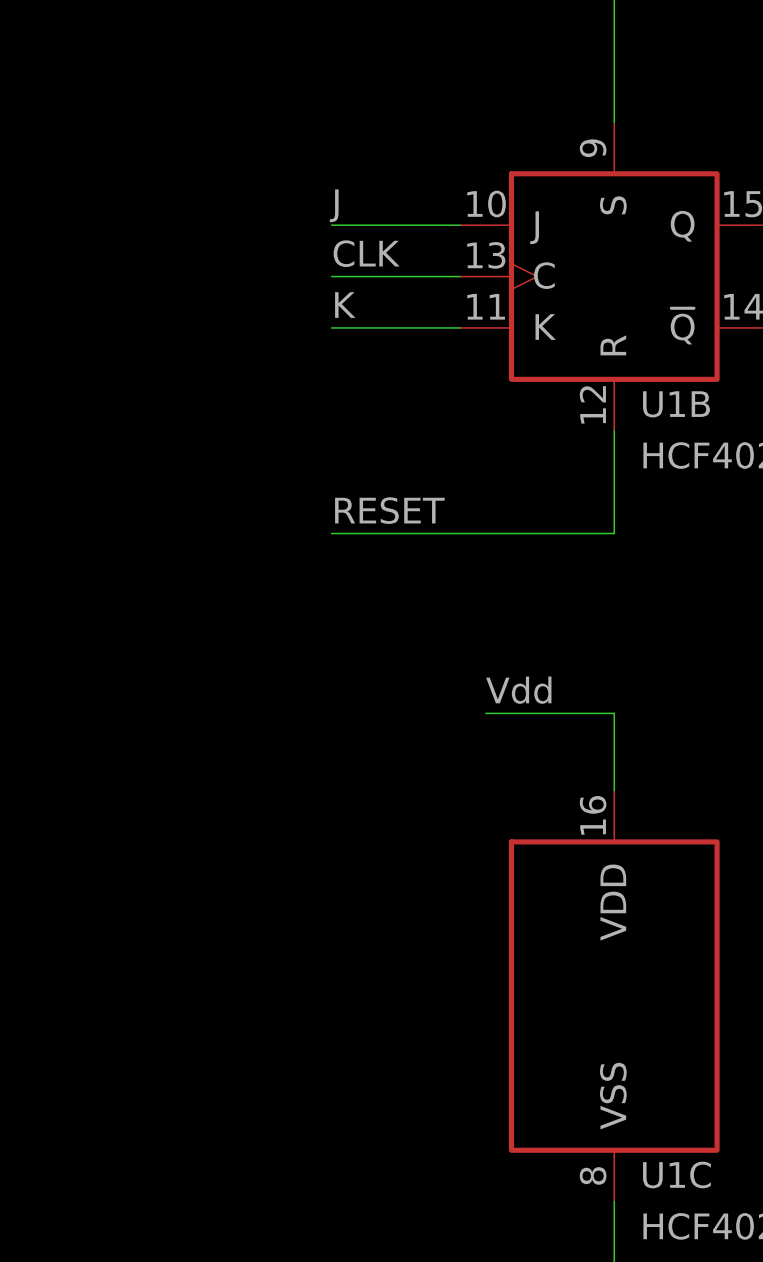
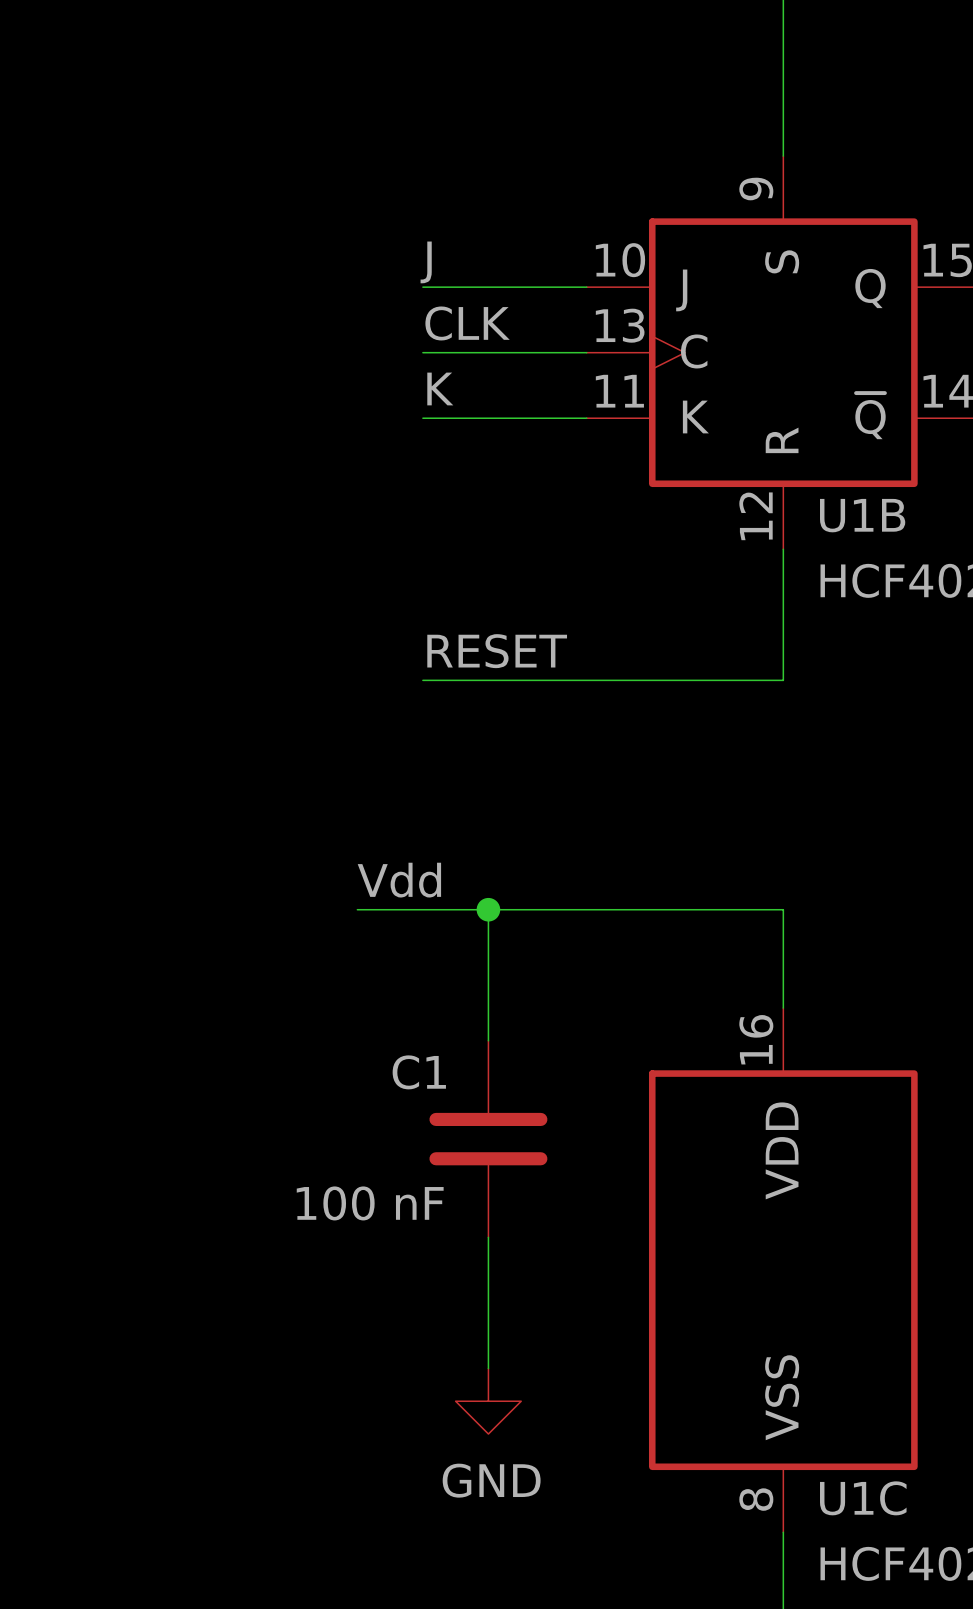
label position: Vdd (518, 690) -> Vdd (399, 880)
wire: none -> (357, 909) (619, 909)
wire: none -> (488, 909) (488, 1040)
junction: none -> (488, 909)
C1: none -> 100 nF (488, 1139)
wire: none -> (488, 1237) (488, 1368)
power symbol: none -> GND (488, 1401)

